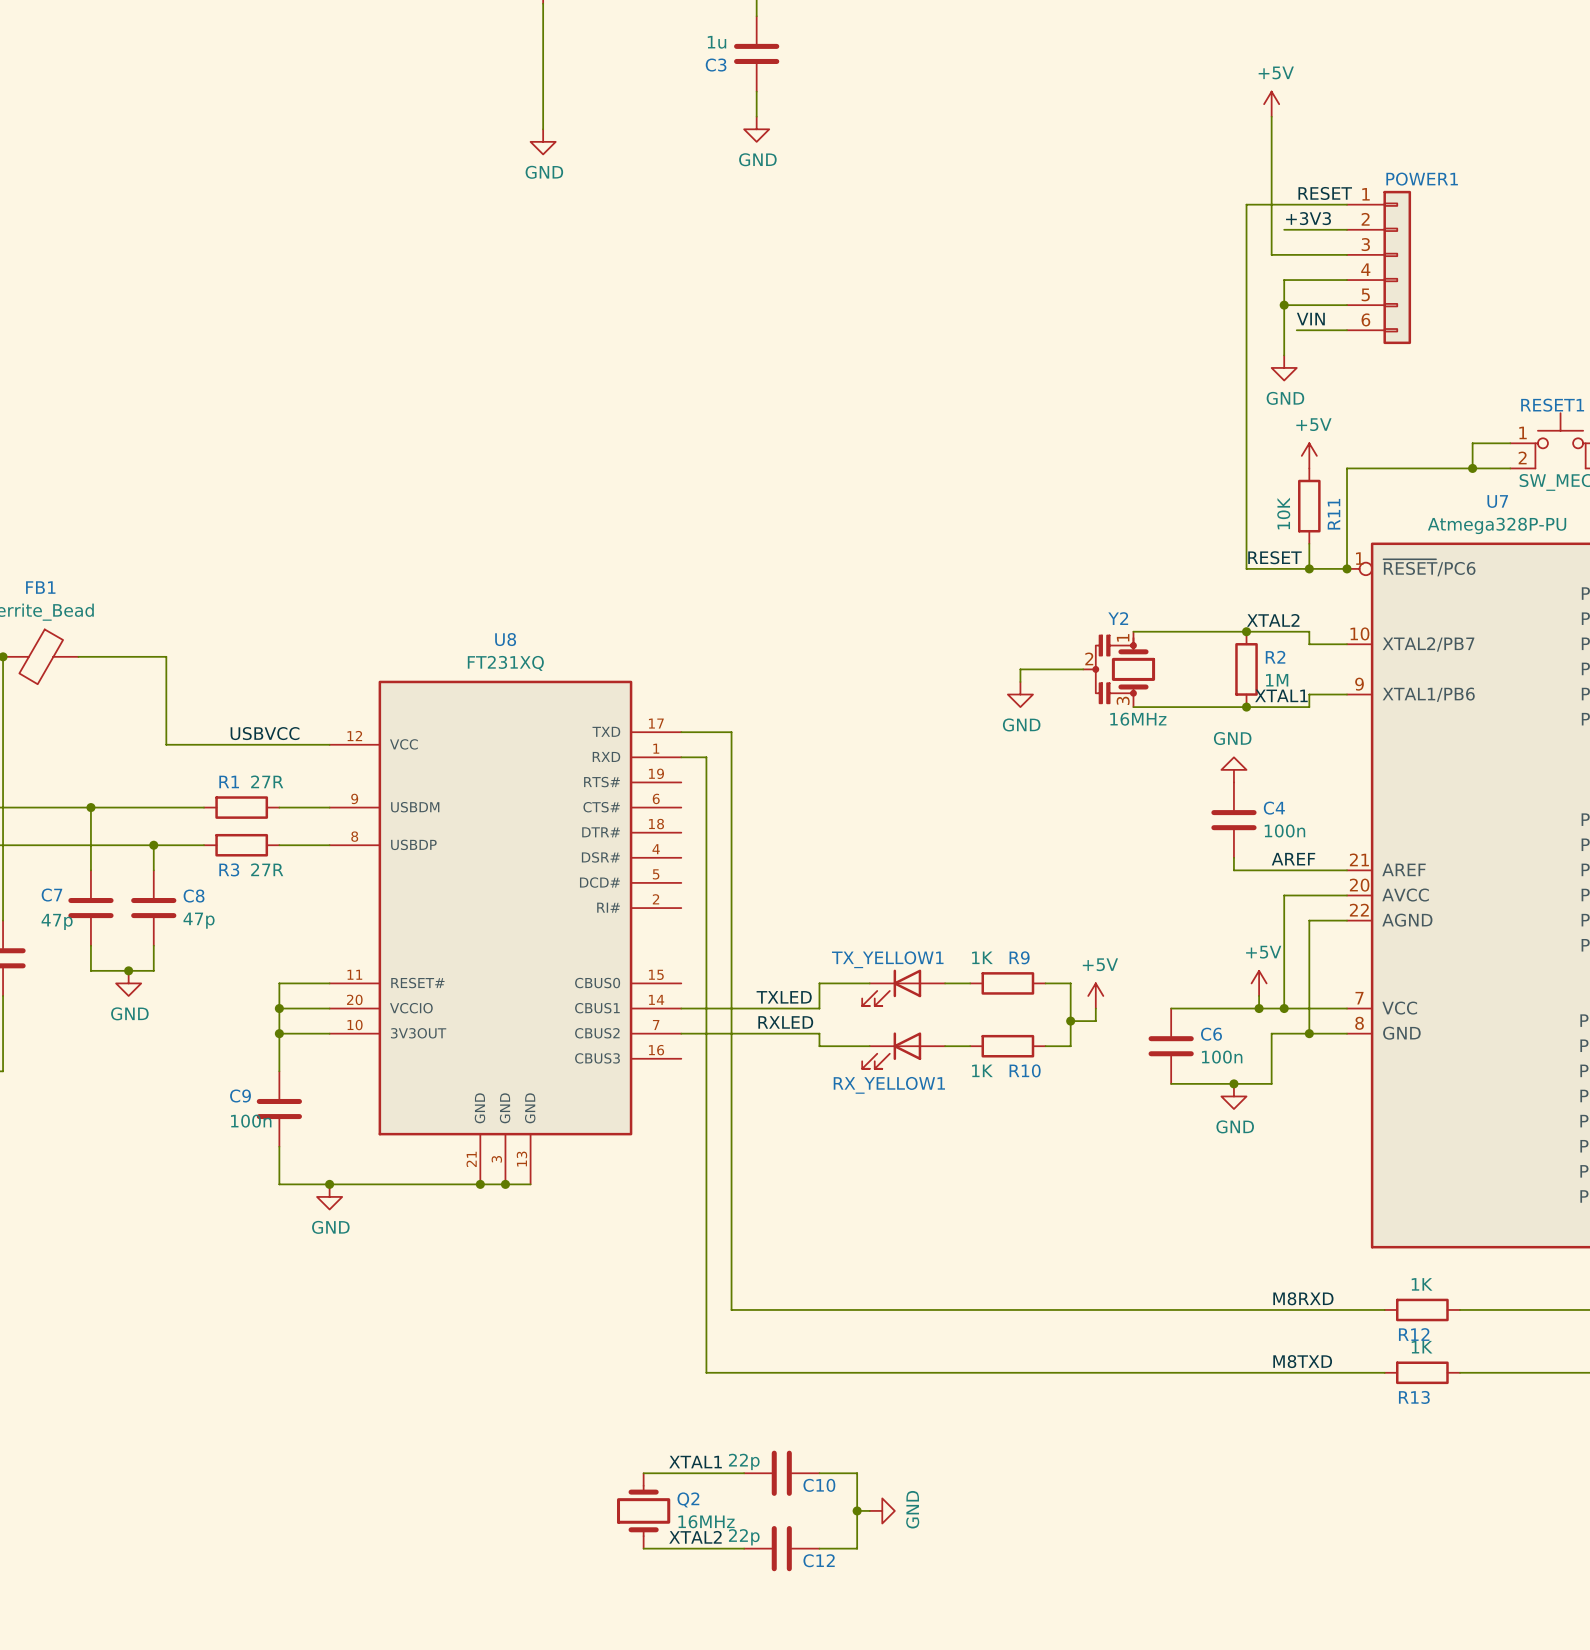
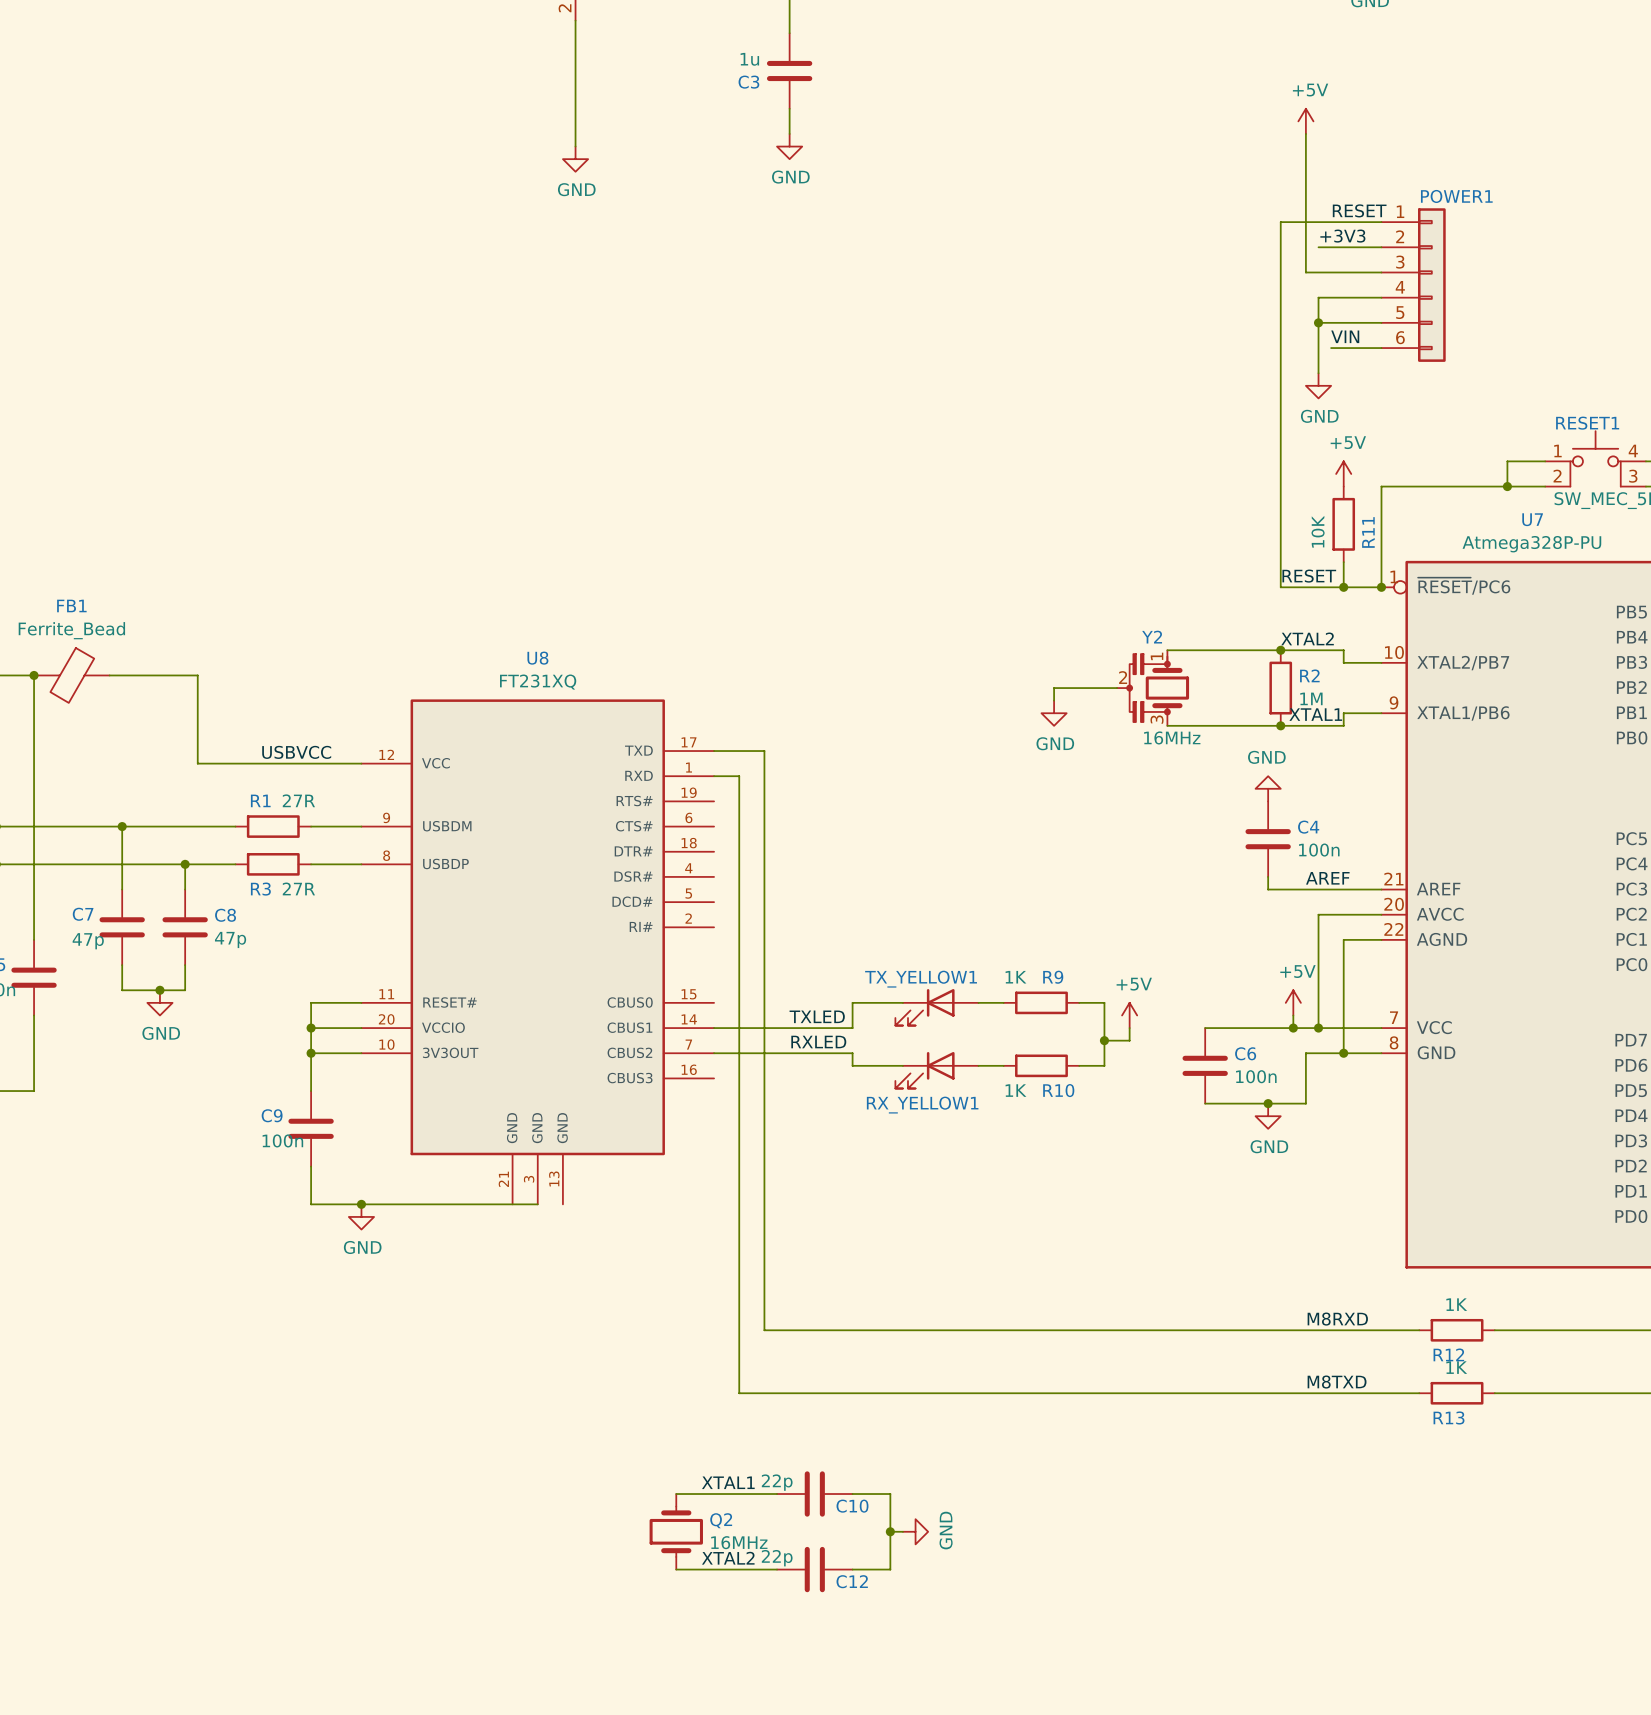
junction: (480, 1184) -> none
wire: (505, 1184) (530, 1184) -> none
junction: (505, 1184) -> none

